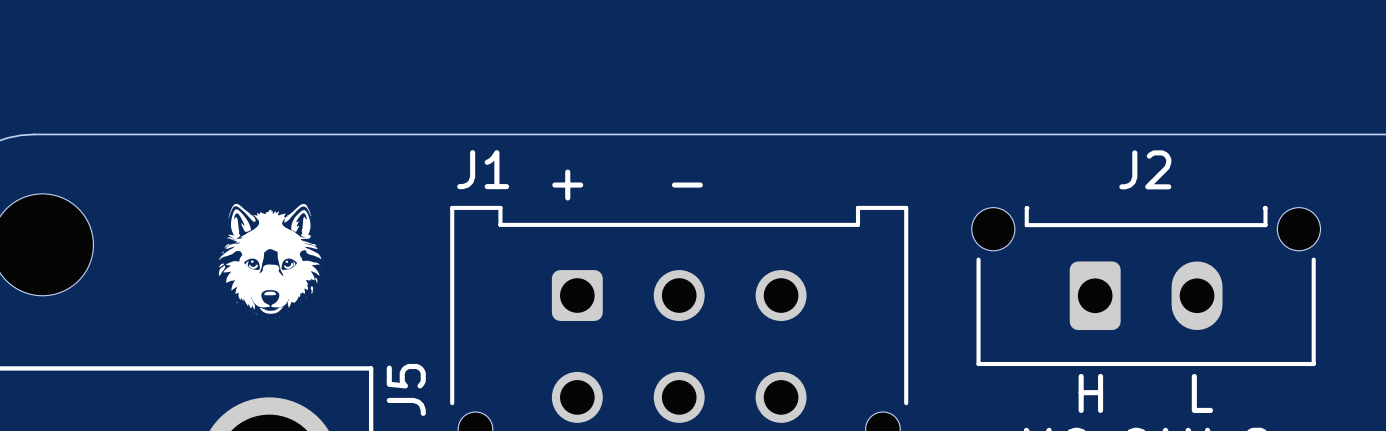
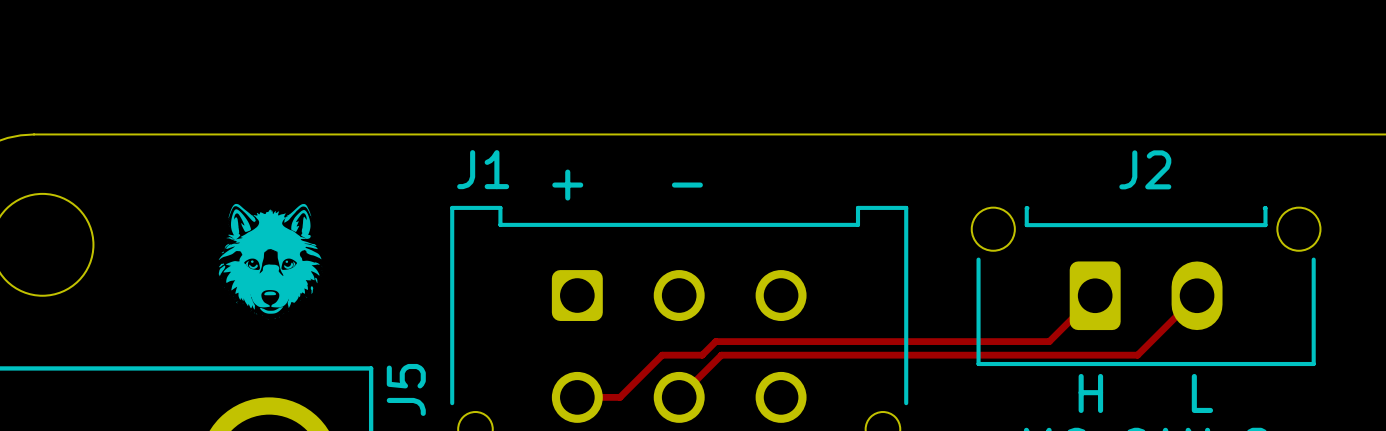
track: none -> (1095, 295) (1049, 341) (715, 341) (702, 355) (662, 355) (620, 397) (577, 397)
track: none -> (1197, 295) (1137, 355) (721, 355) (679, 397)

